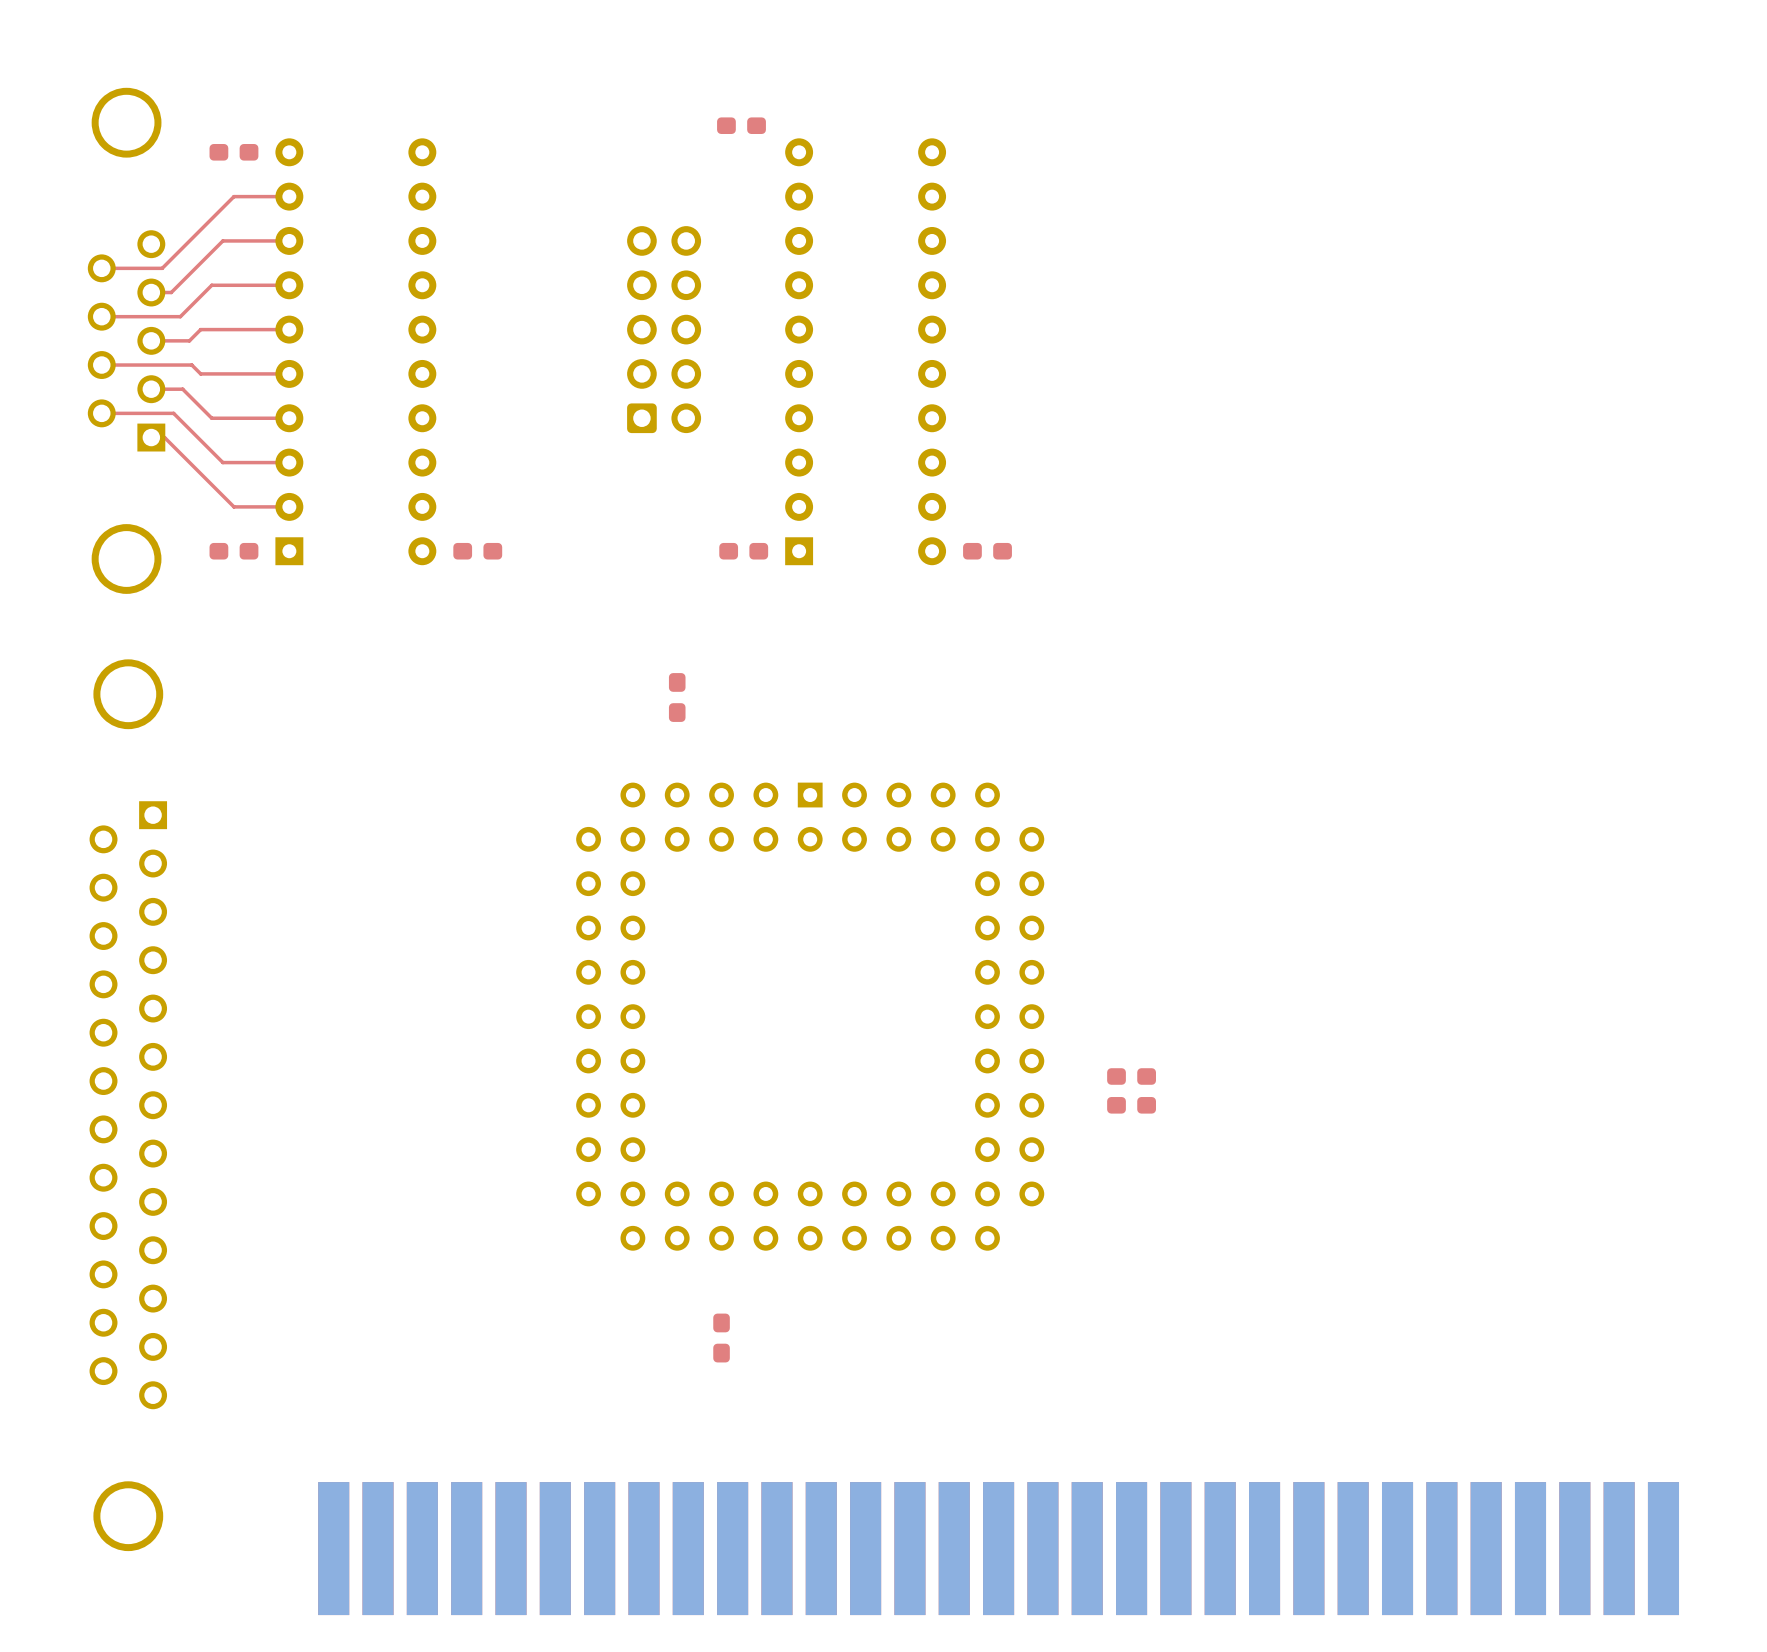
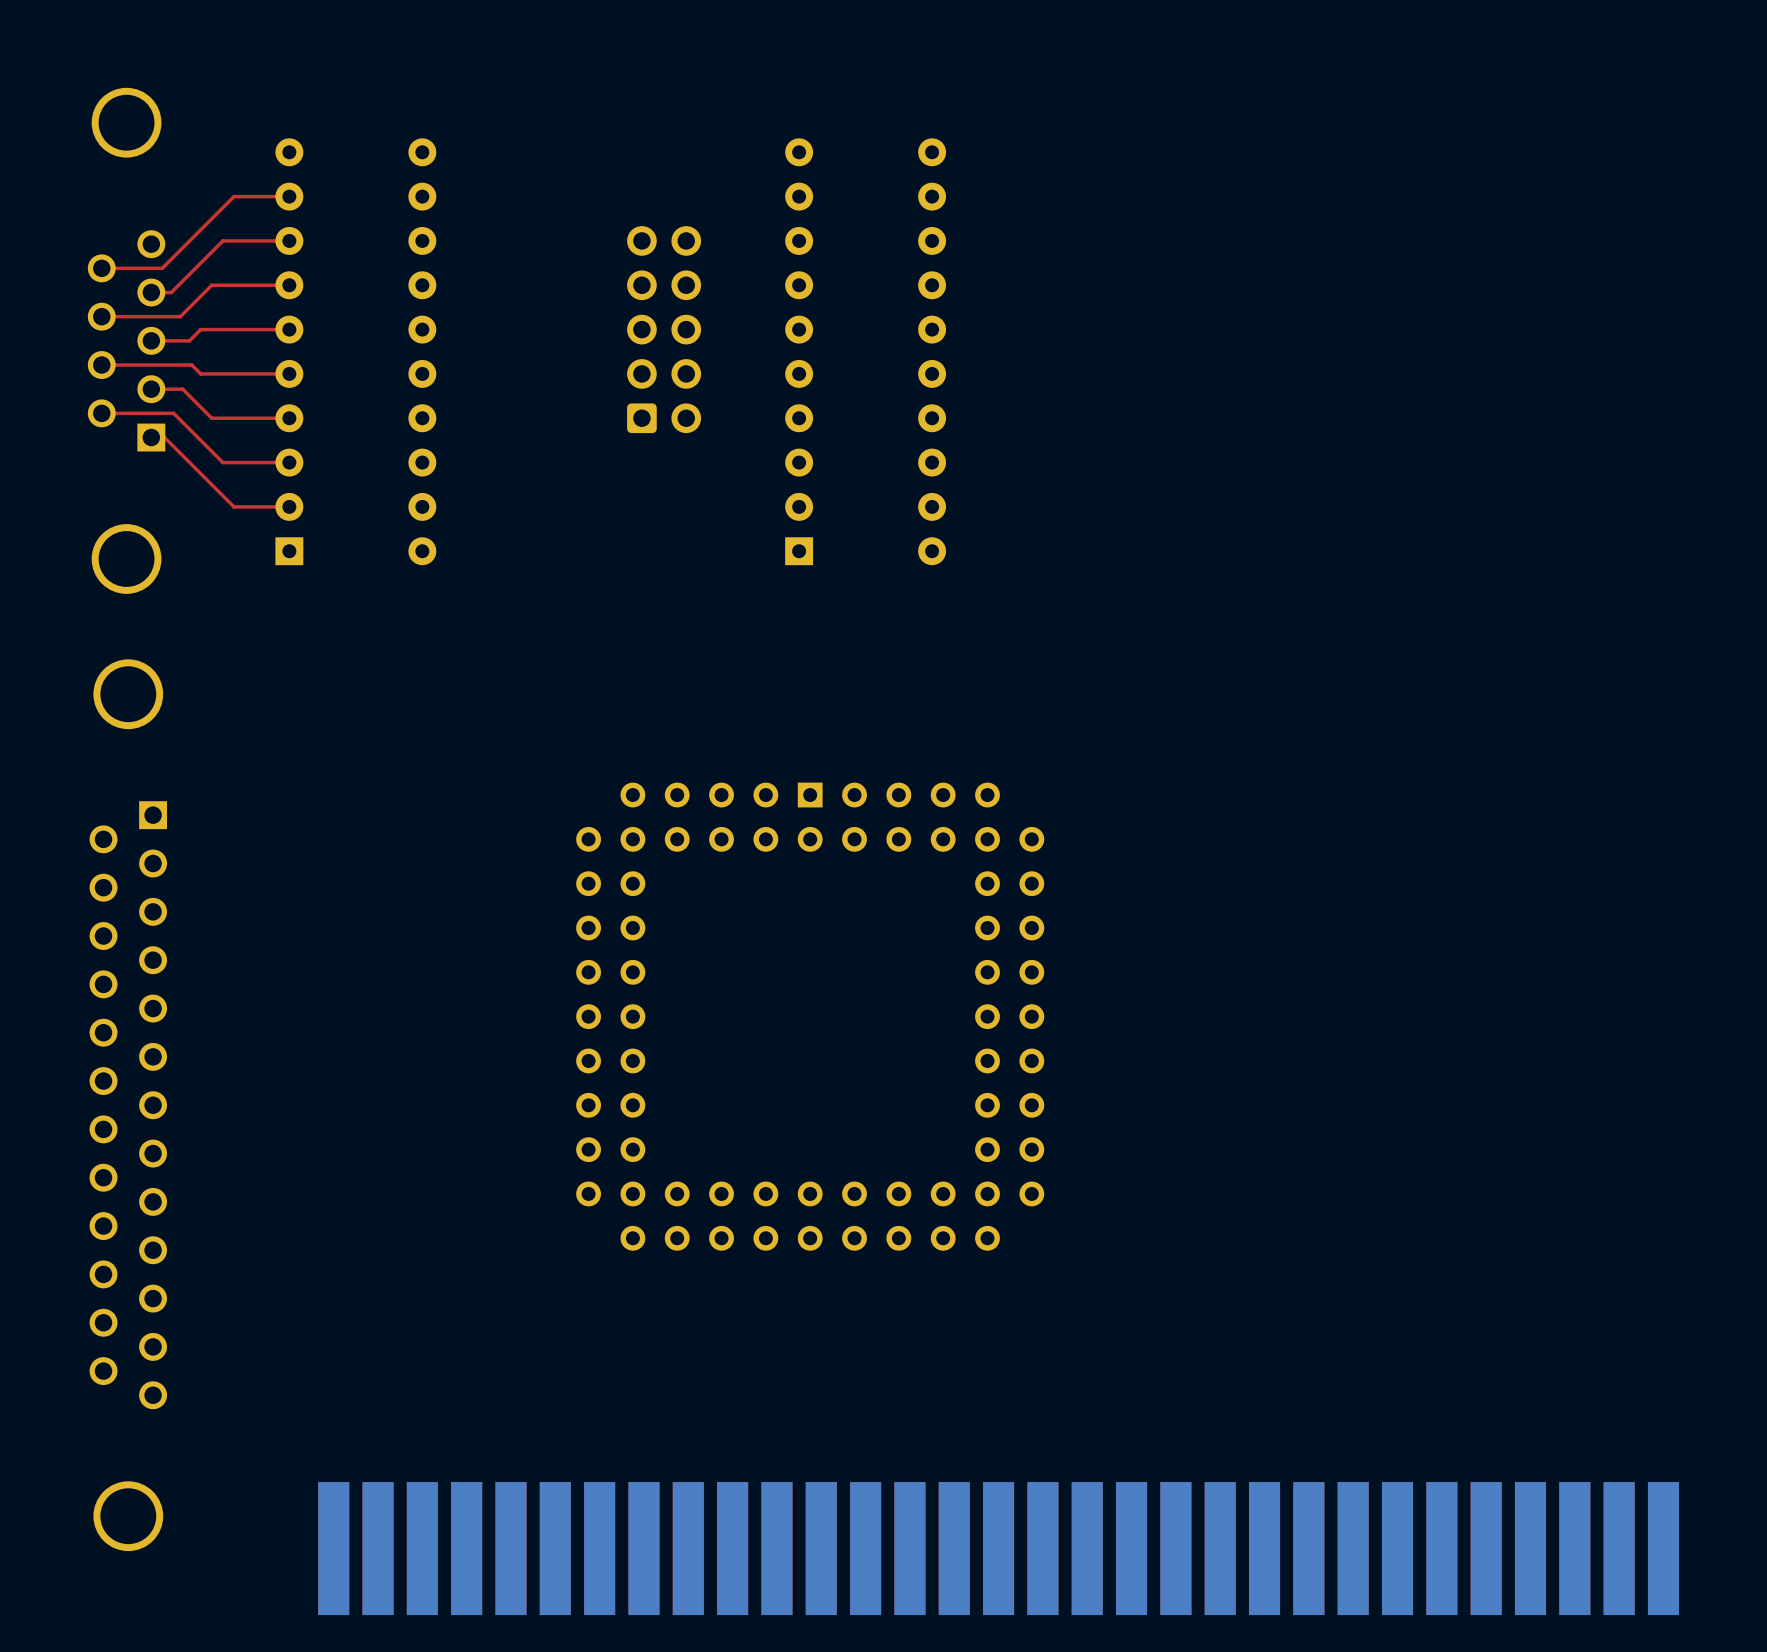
part: (741, 125) -> none
part: (233, 152) -> none
part: (233, 551) -> none
part: (477, 551) -> none
part: (743, 551) -> none
part: (987, 551) -> none
part: (677, 697) -> none
part: (1131, 1076) -> none
part: (1131, 1105) -> none
part: (721, 1338) -> none

